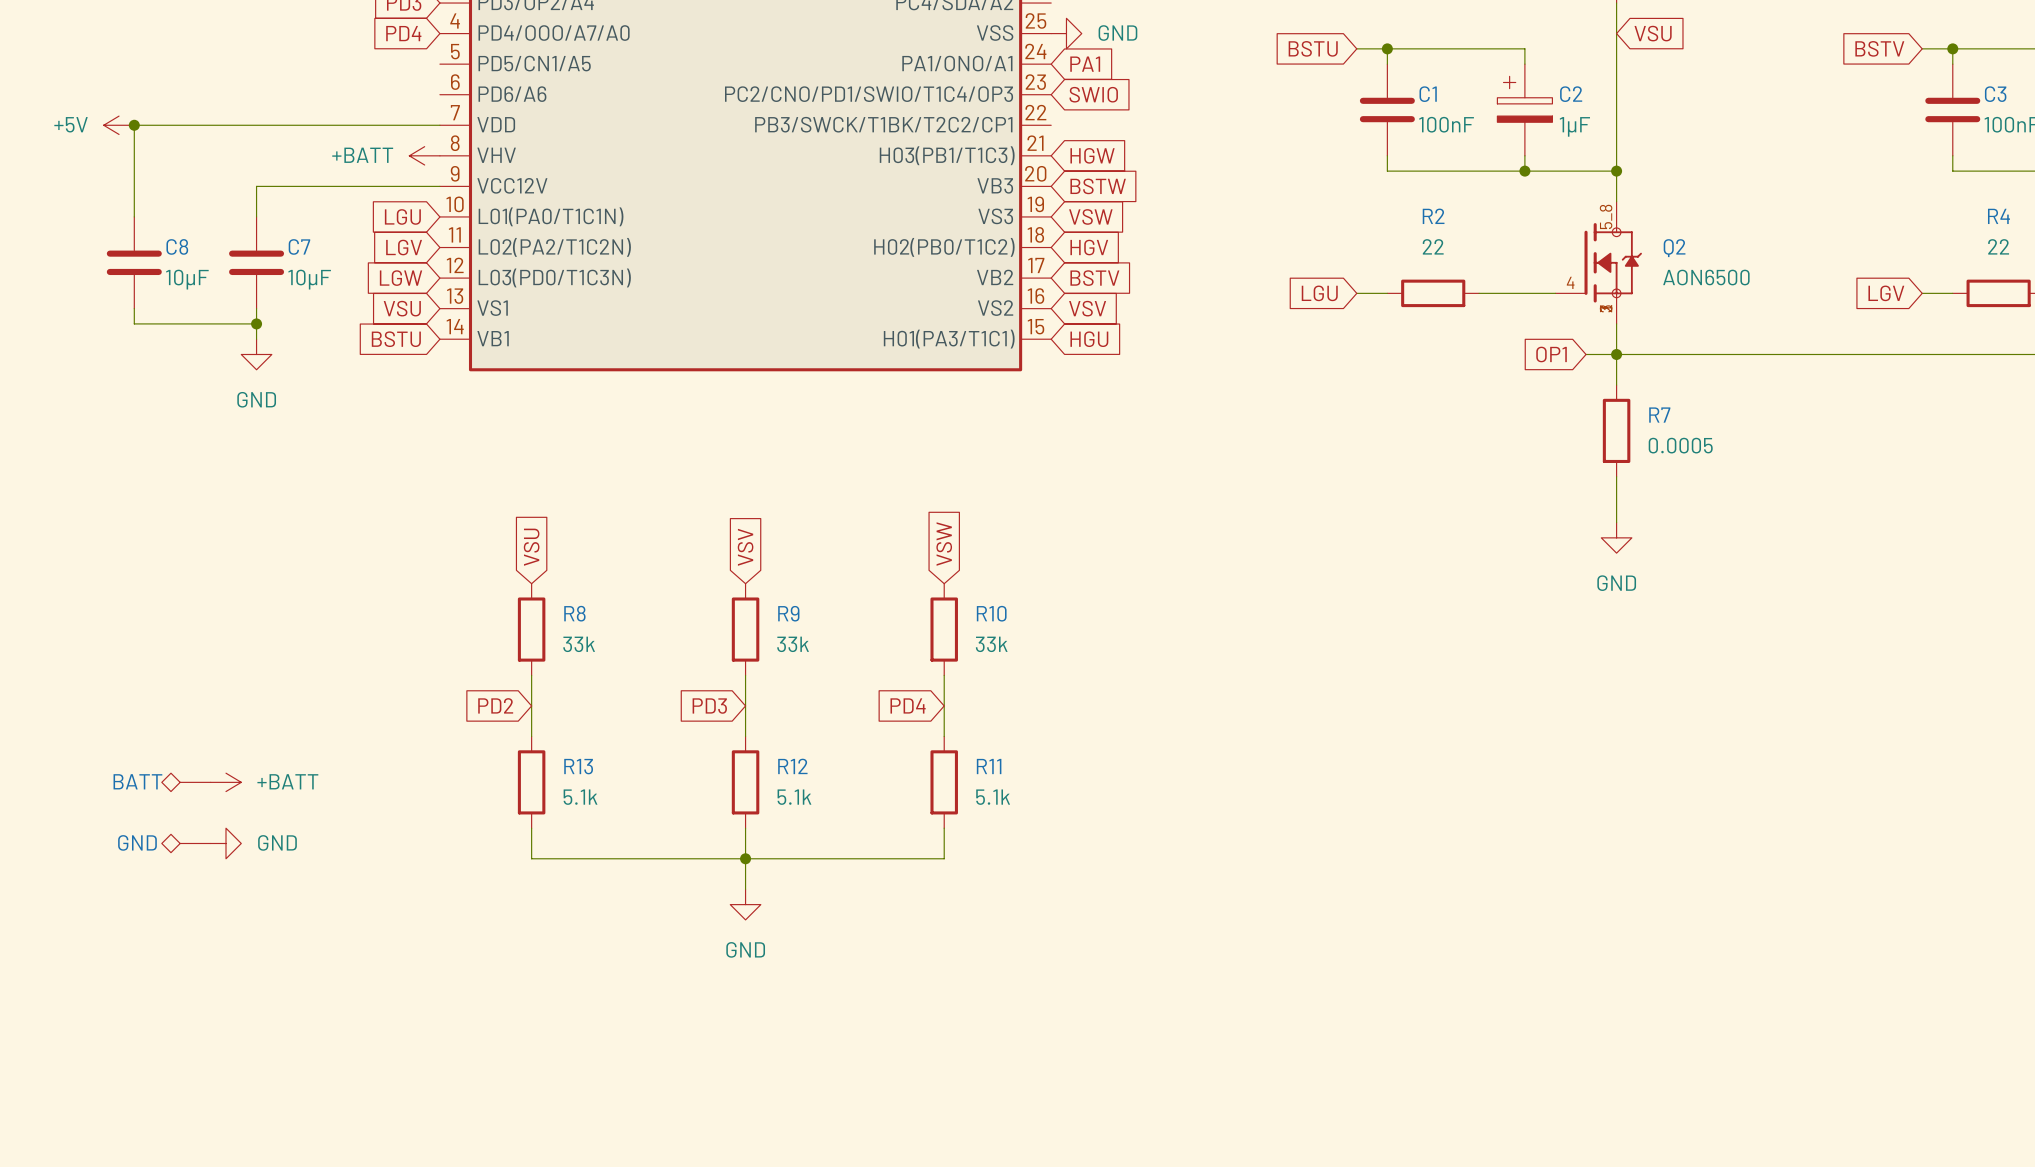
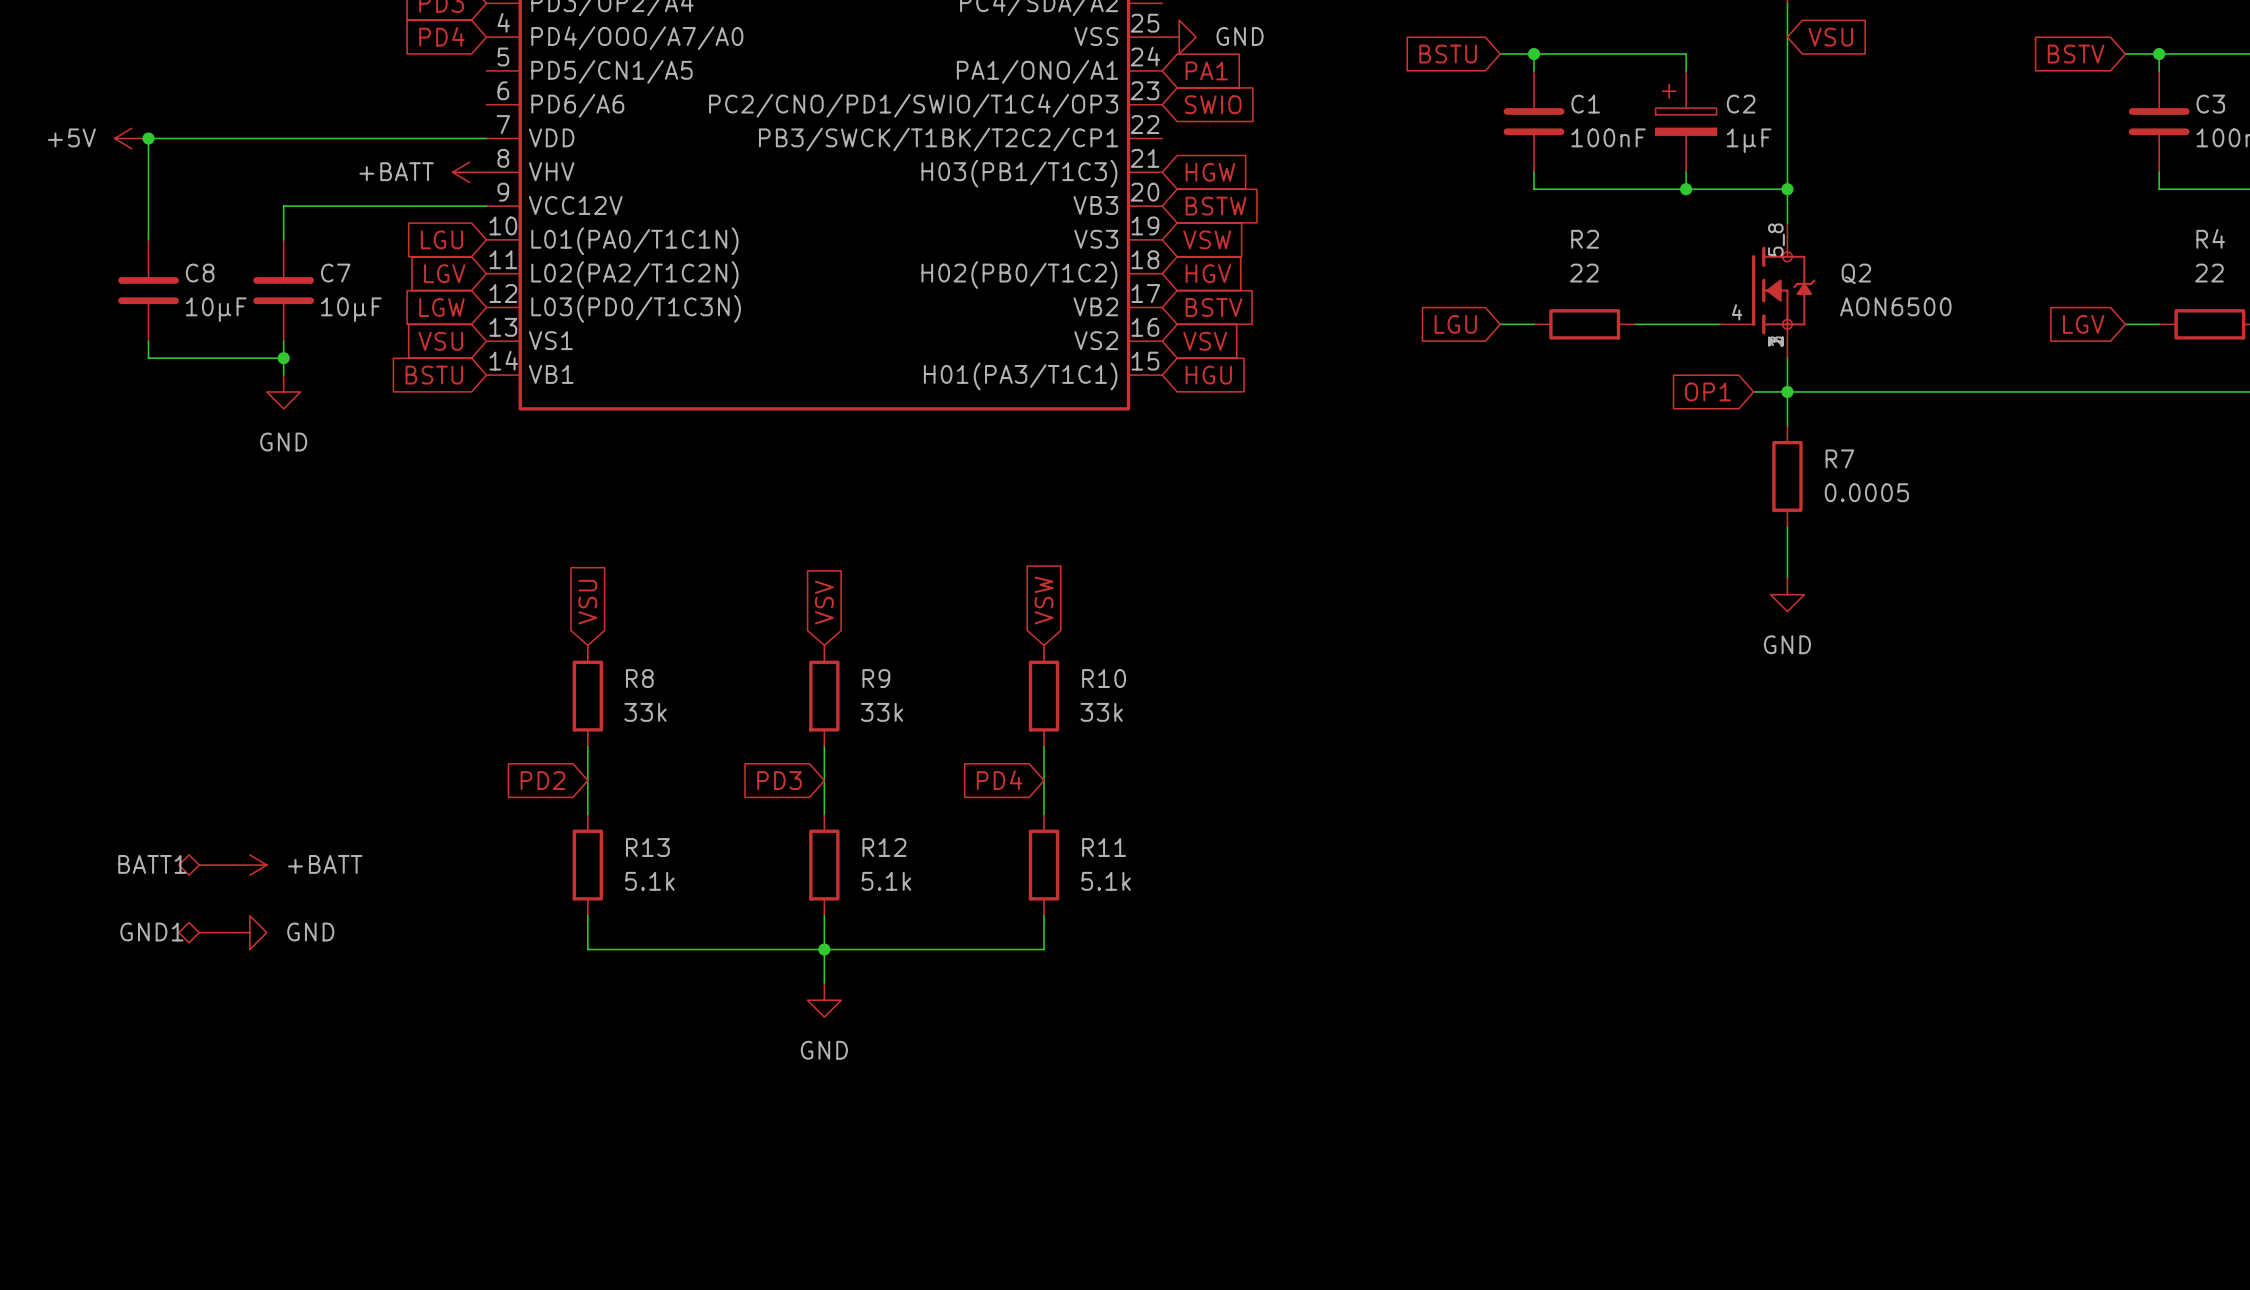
BATT name: BATT (137, 781) -> BATT1 (152, 864)
GND name: GND (137, 842) -> GND1 (151, 932)

